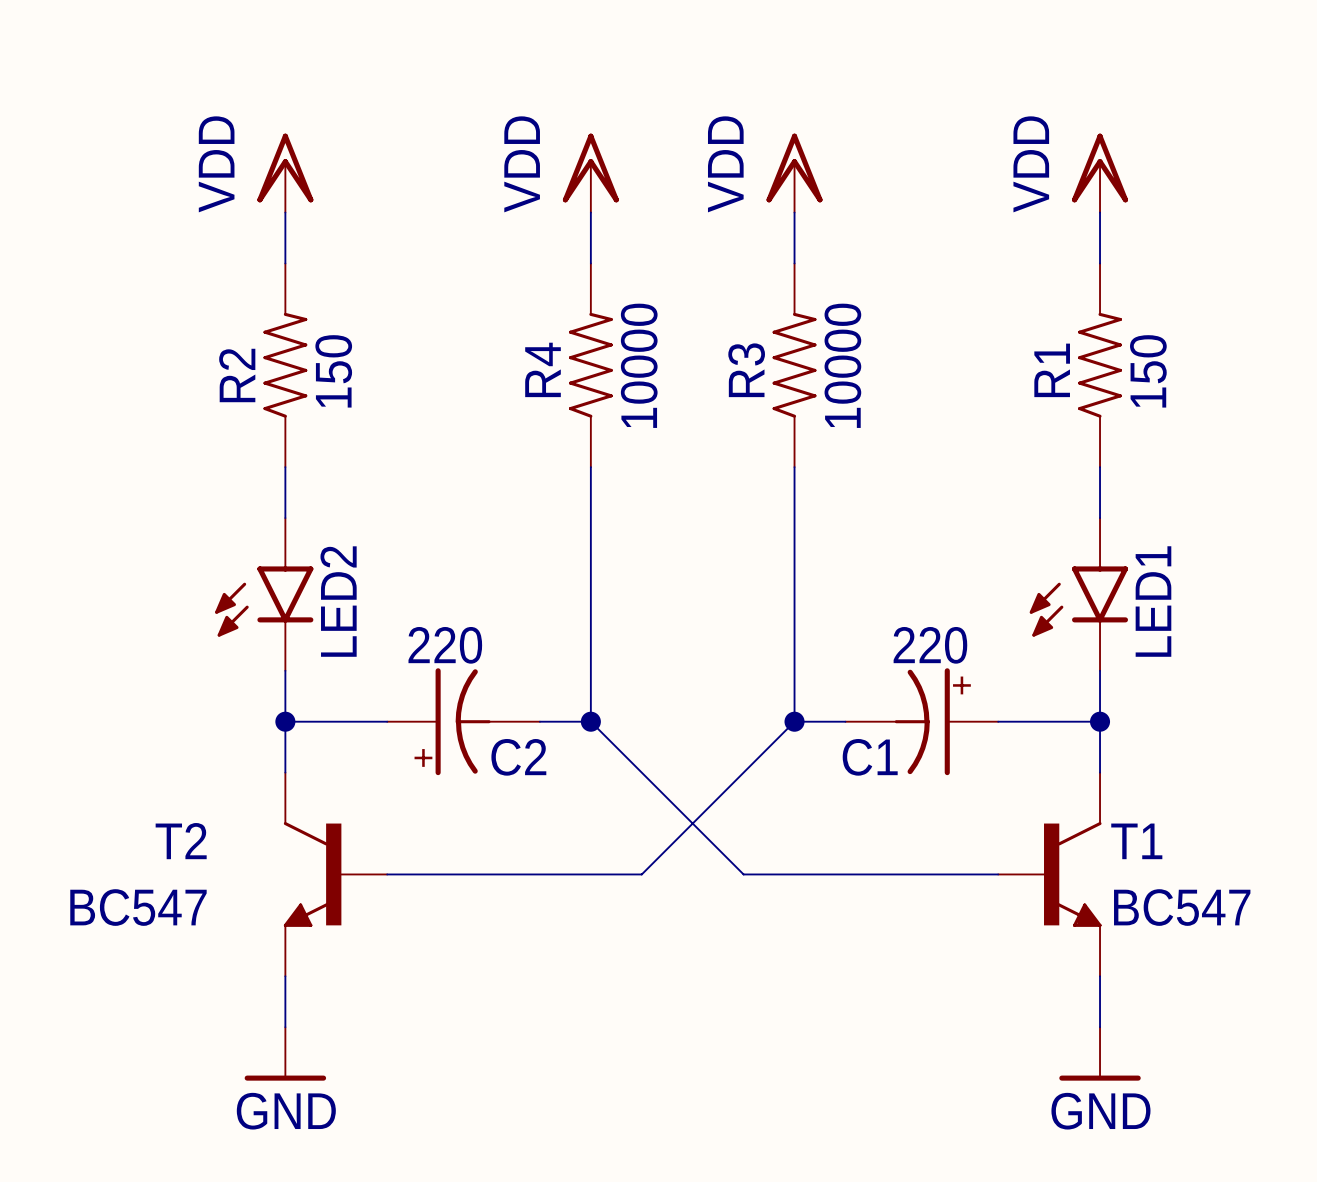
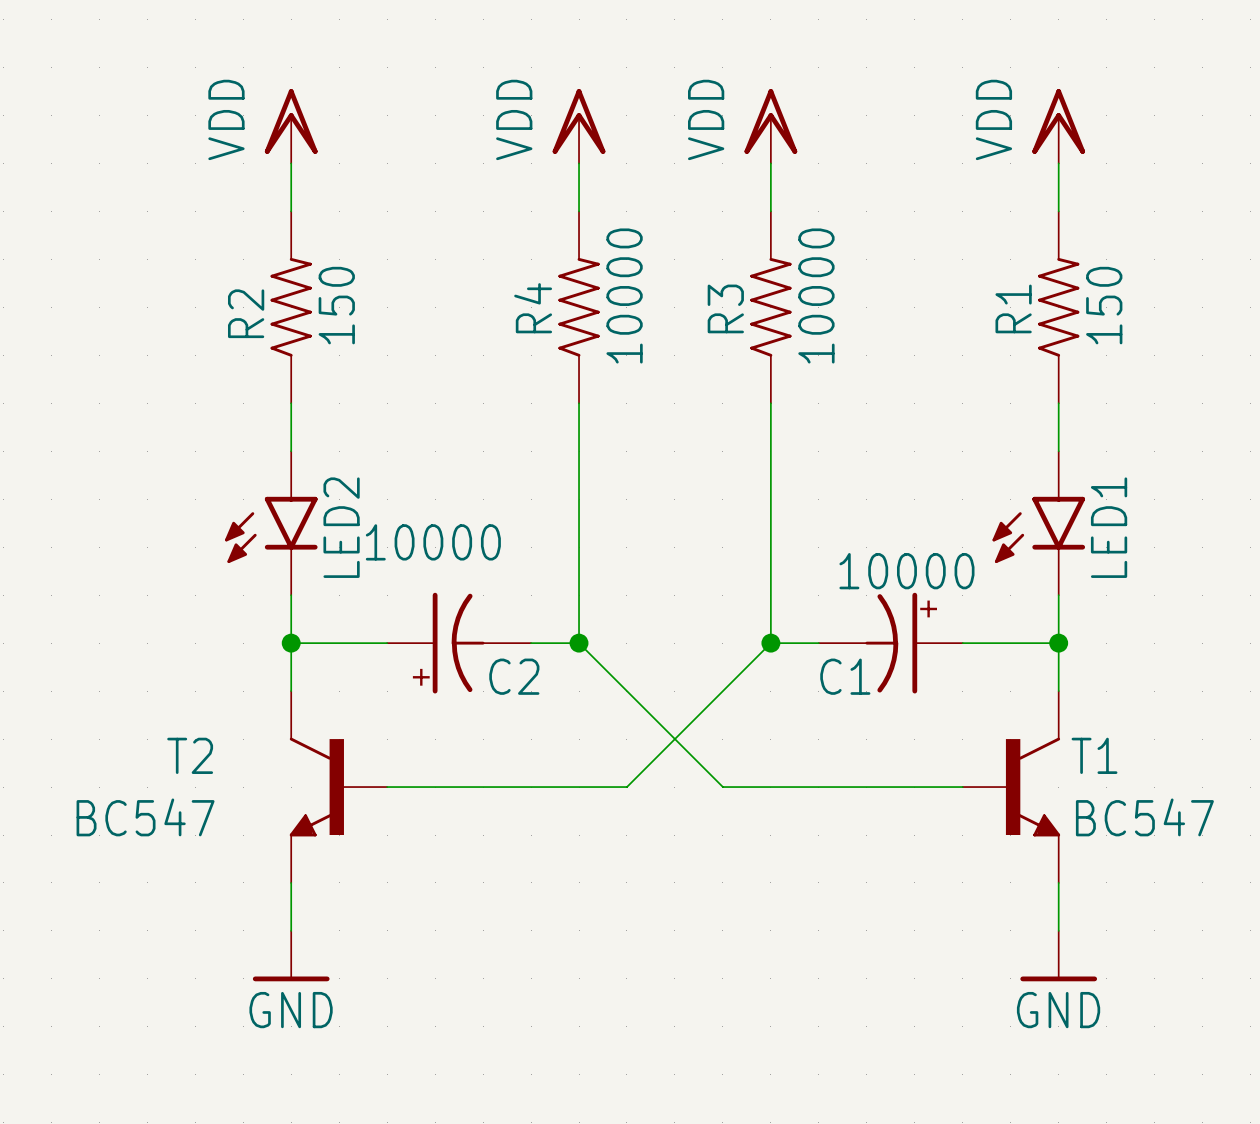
C2 value: 220 (445, 645) -> 10000 (433, 542)
C1 value: 220 (930, 645) -> 10000 (906, 571)

